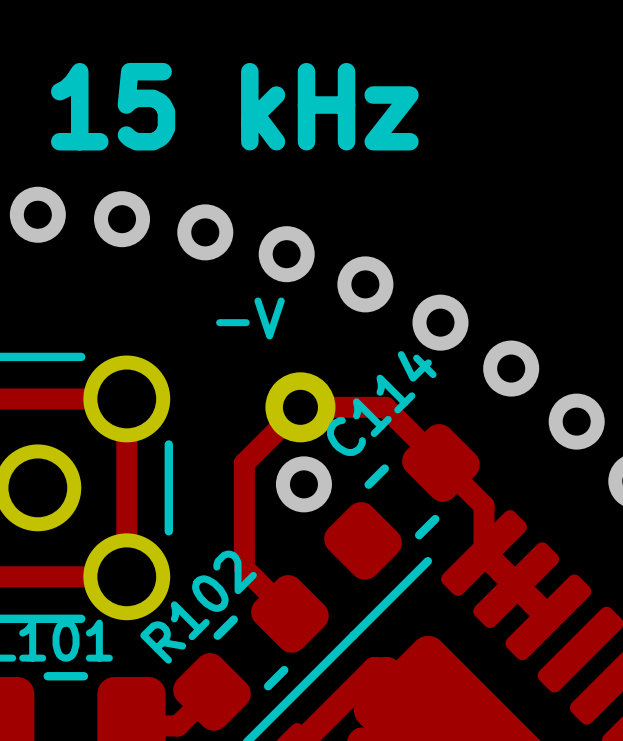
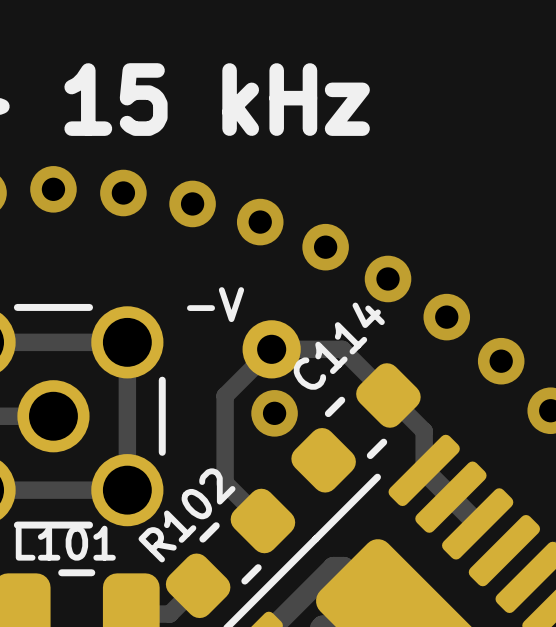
text position: -V (250, 318) -> -V (215, 304)

